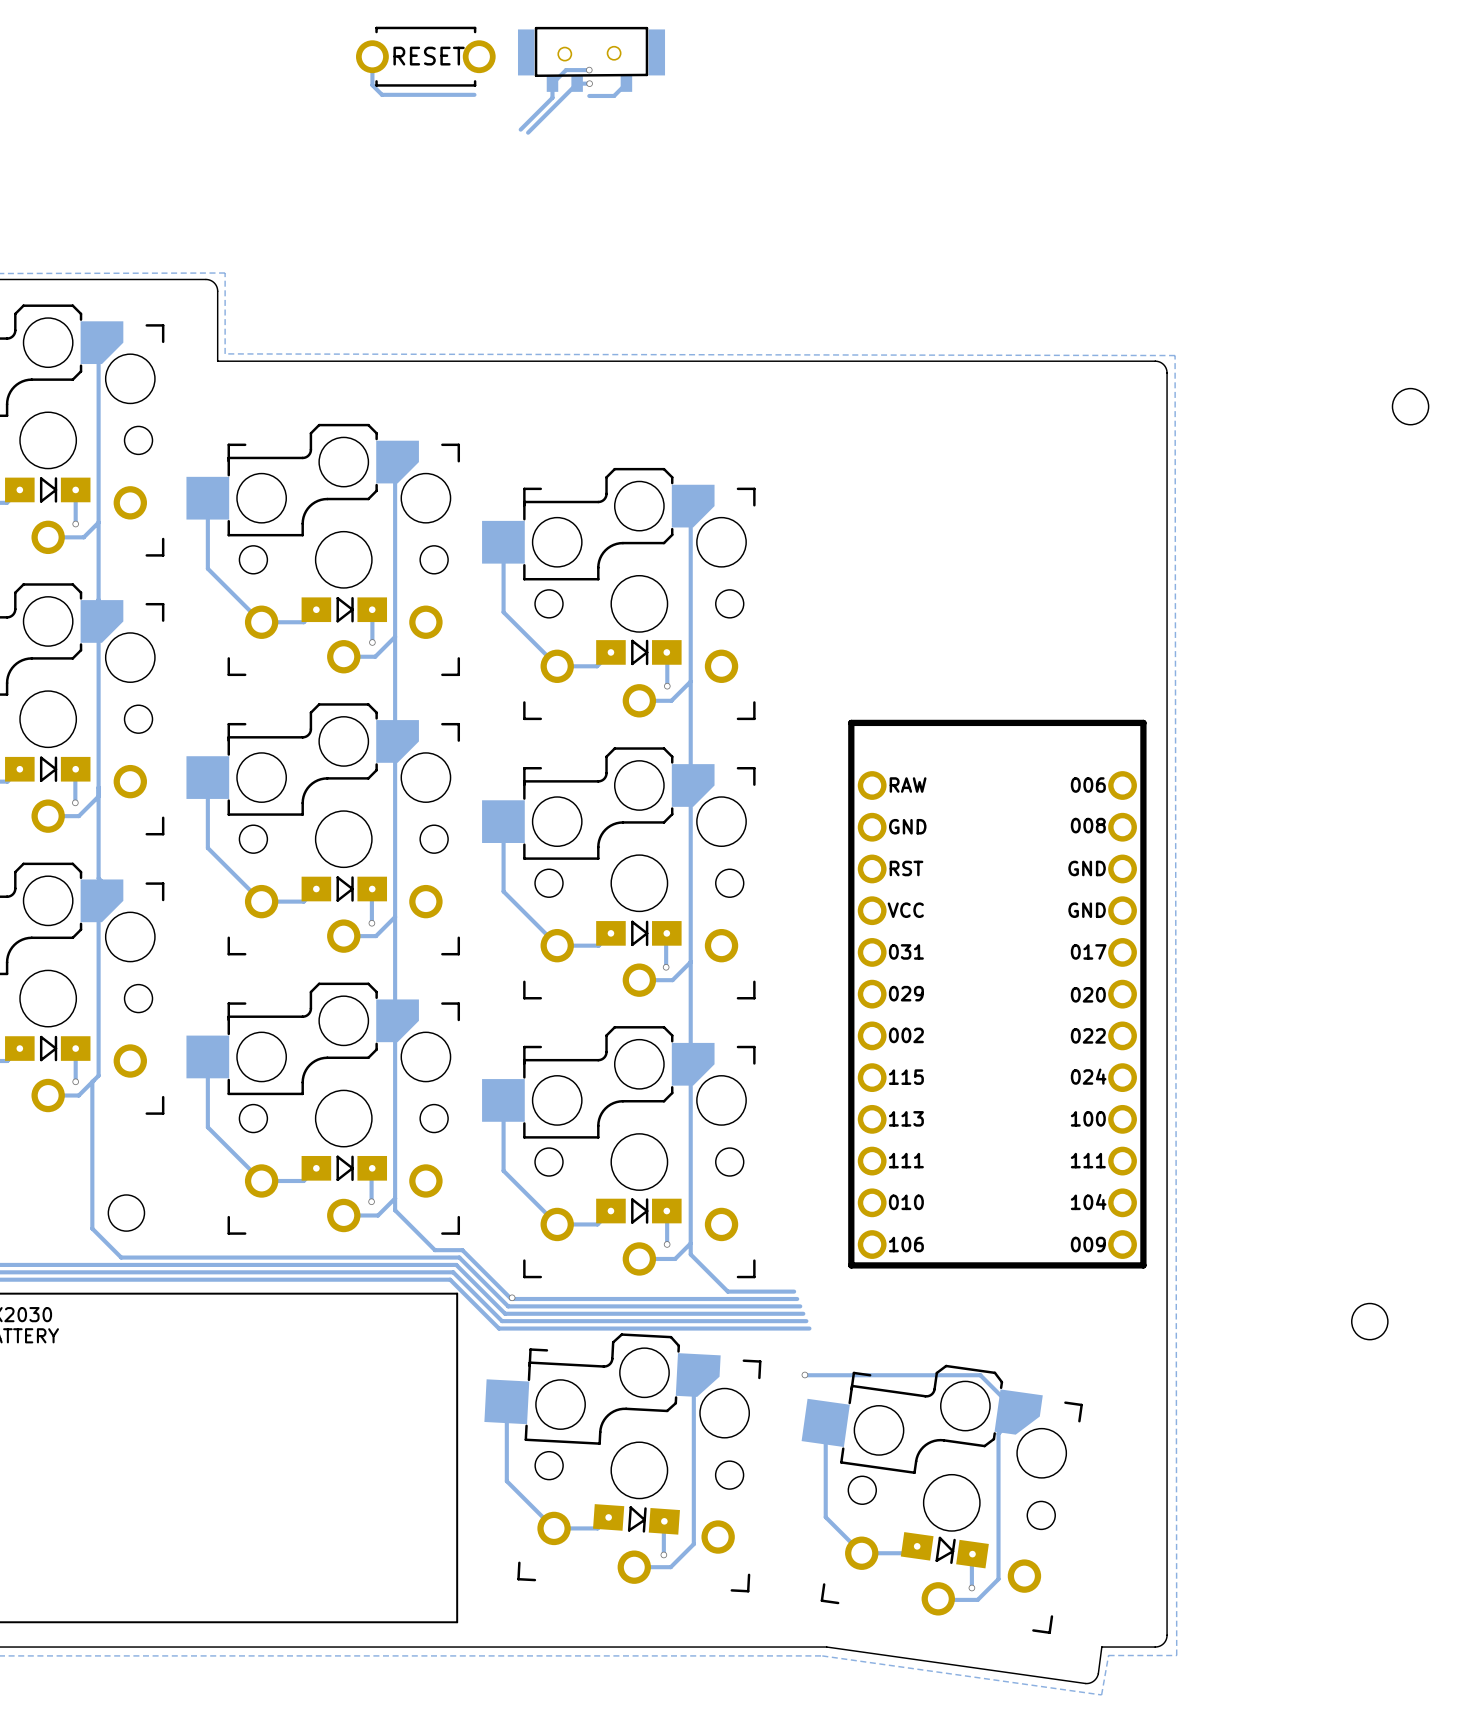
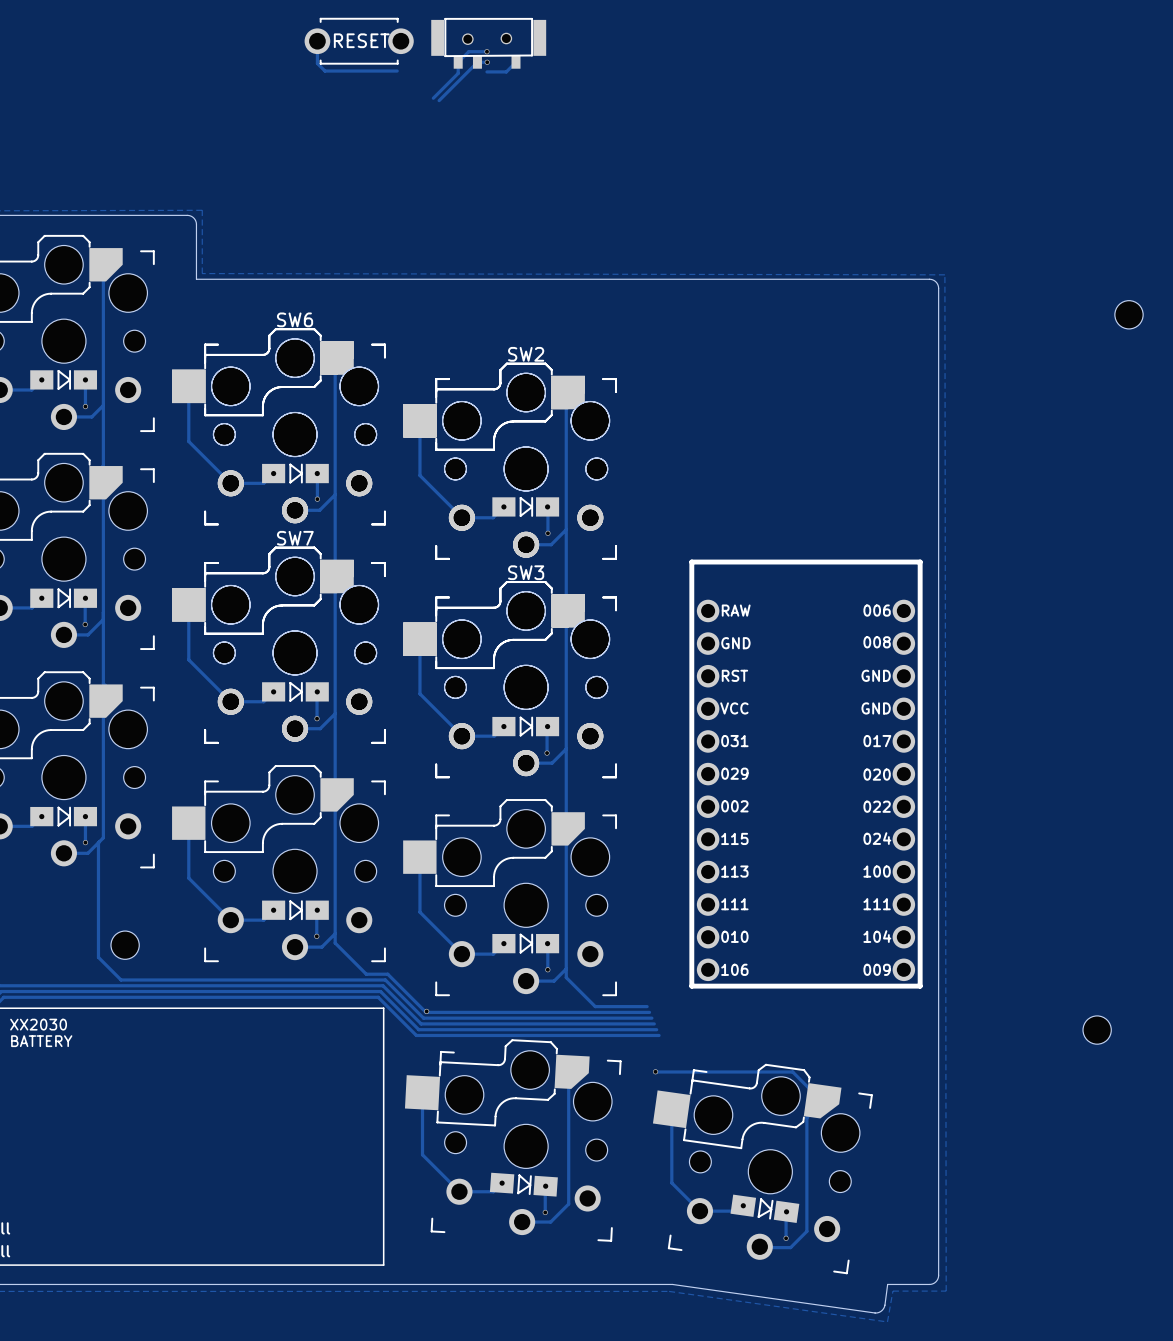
SW6: none -> (278, 426)
SW2: none -> (510, 461)
SW7: none -> (278, 645)
SW3: none -> (510, 679)

